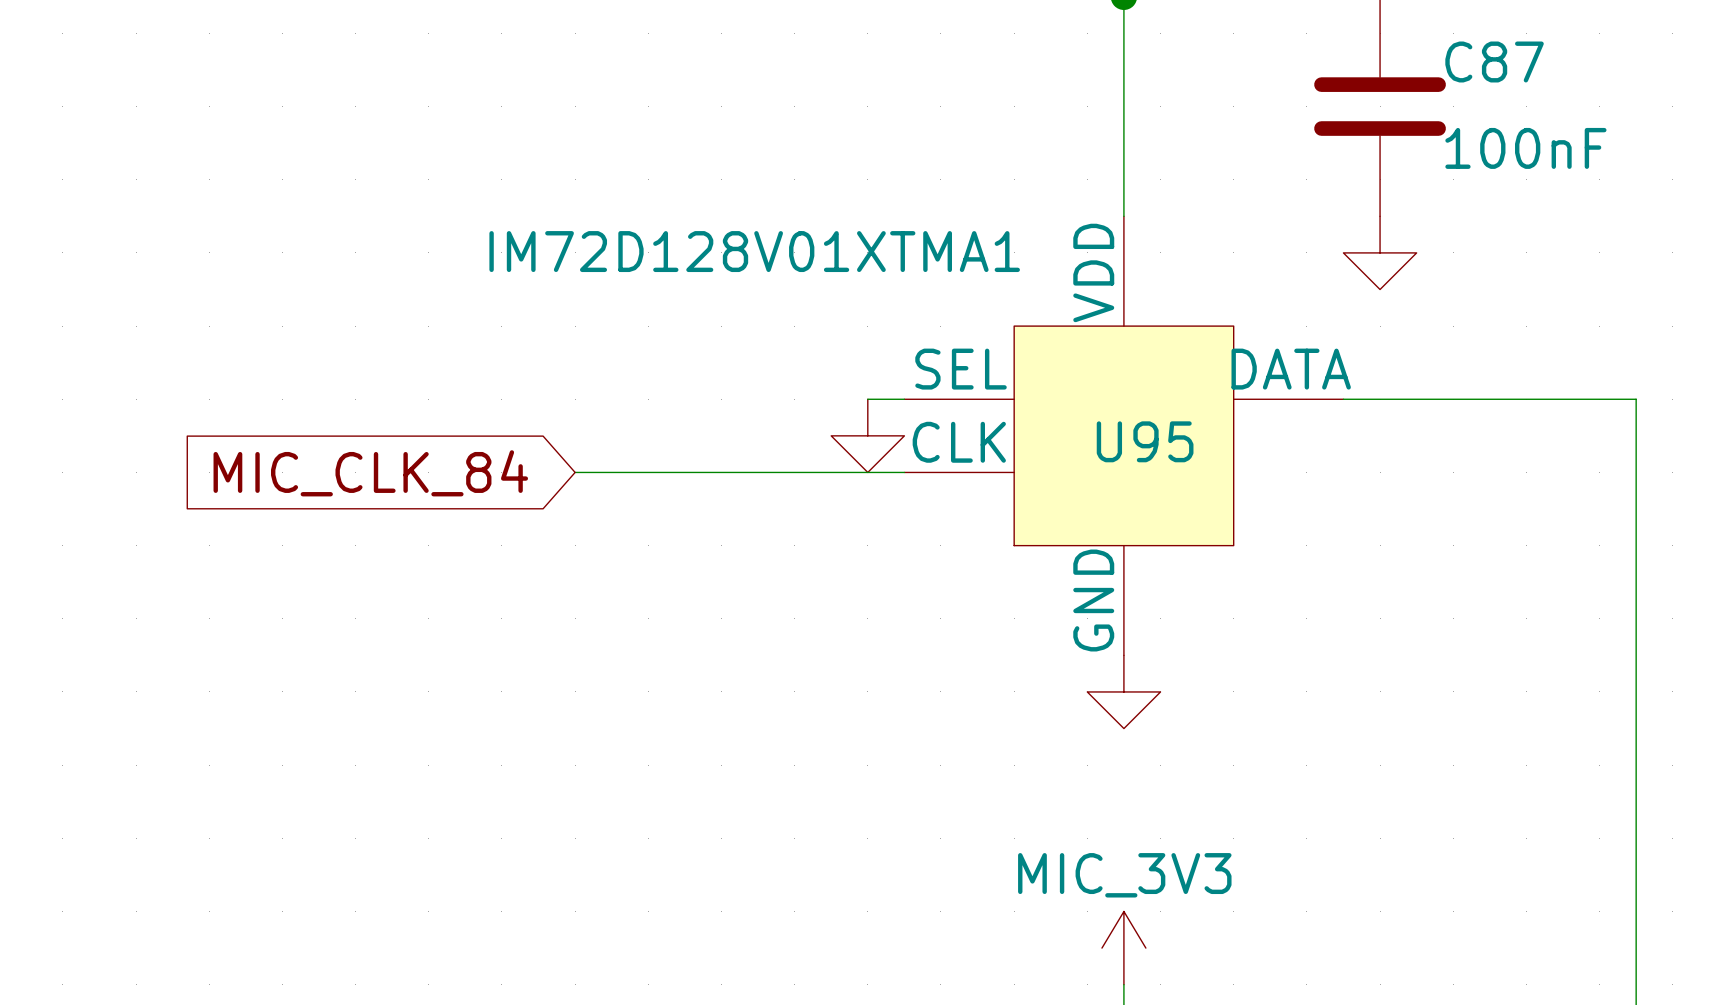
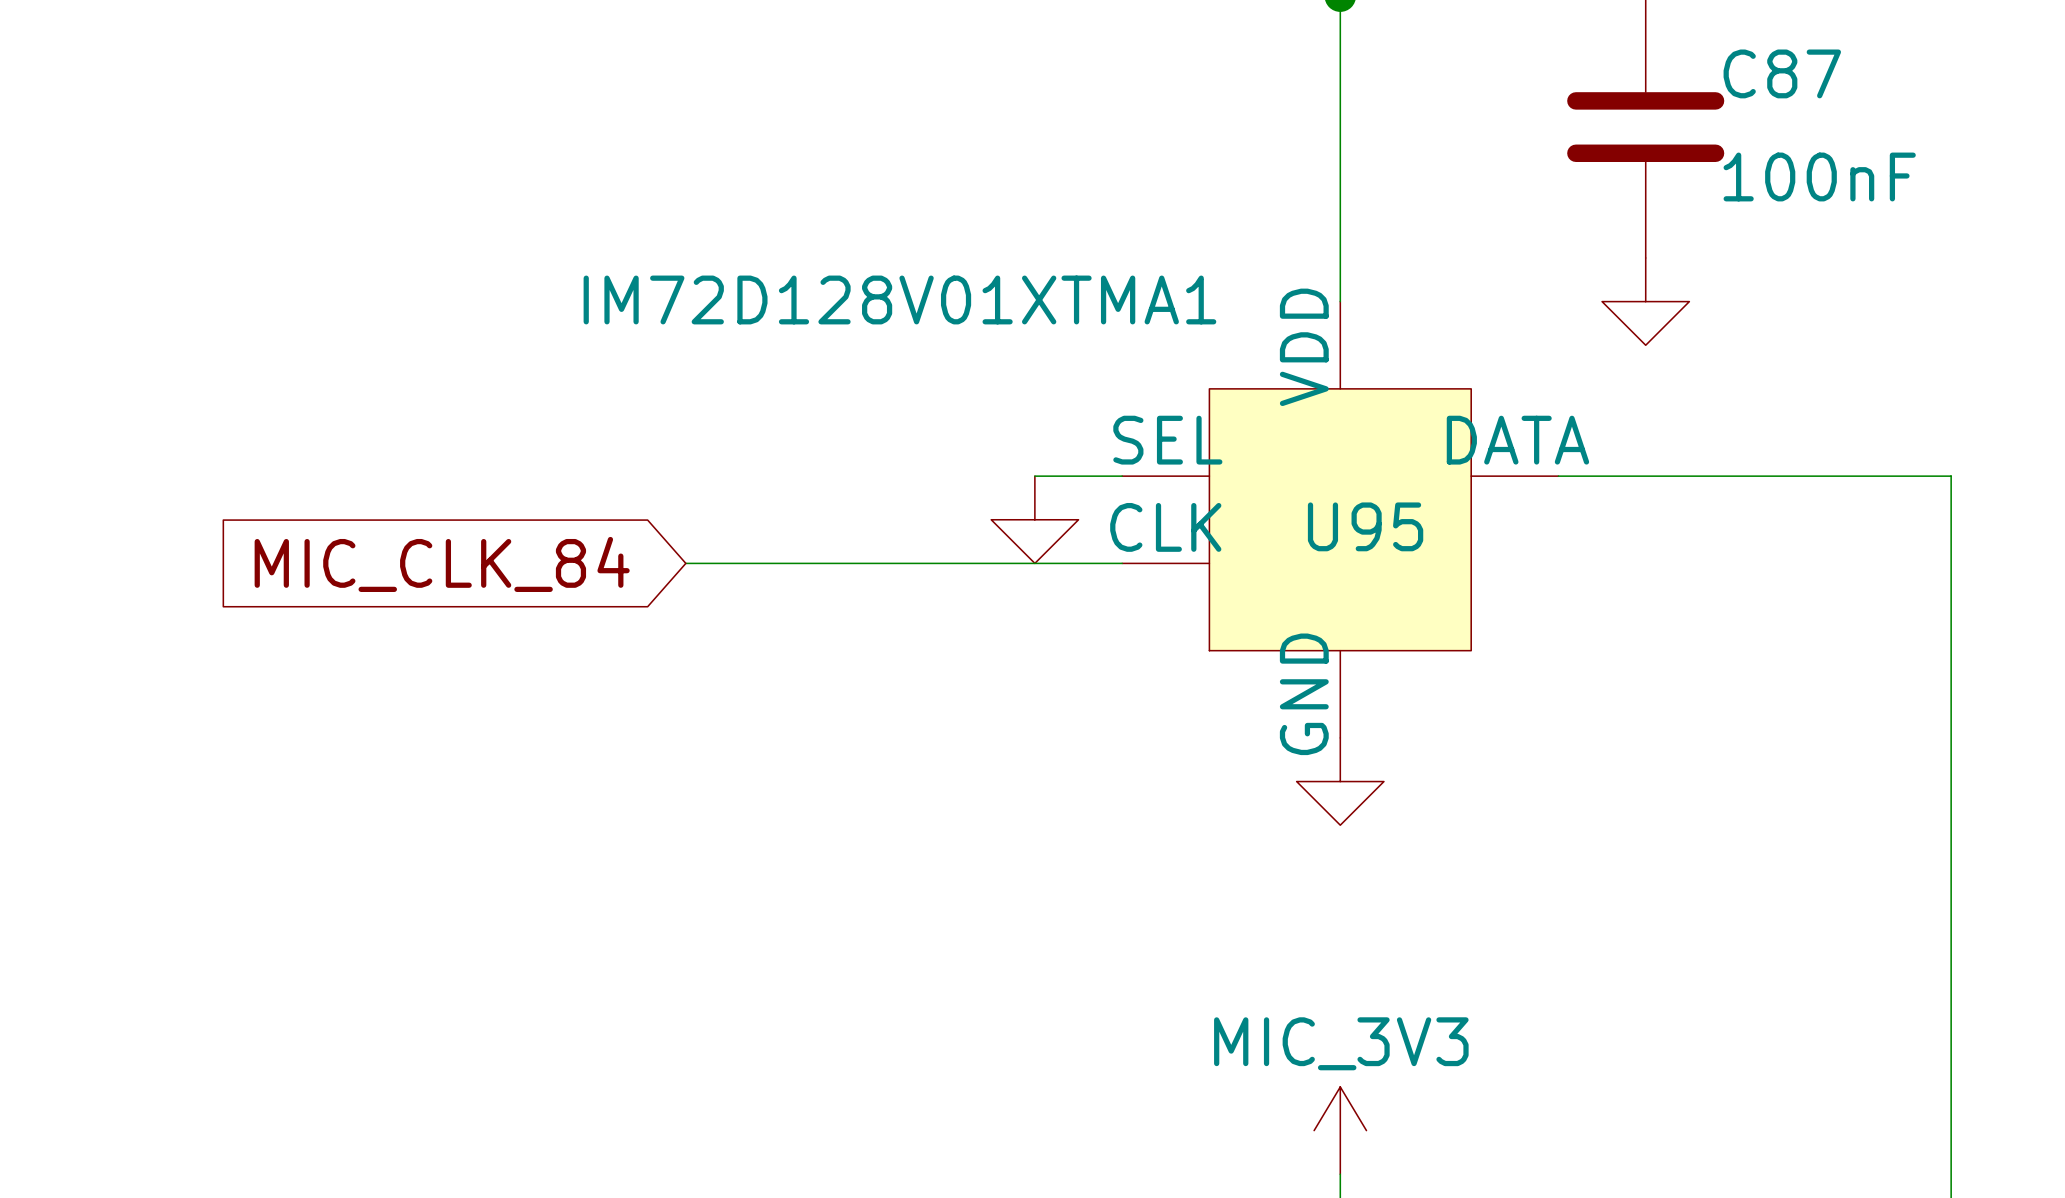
U95 symbol: [904, 216, 1344, 656] -> [1122, 301, 1559, 738]
power symbol position: (1123, 691) -> (1340, 781)

